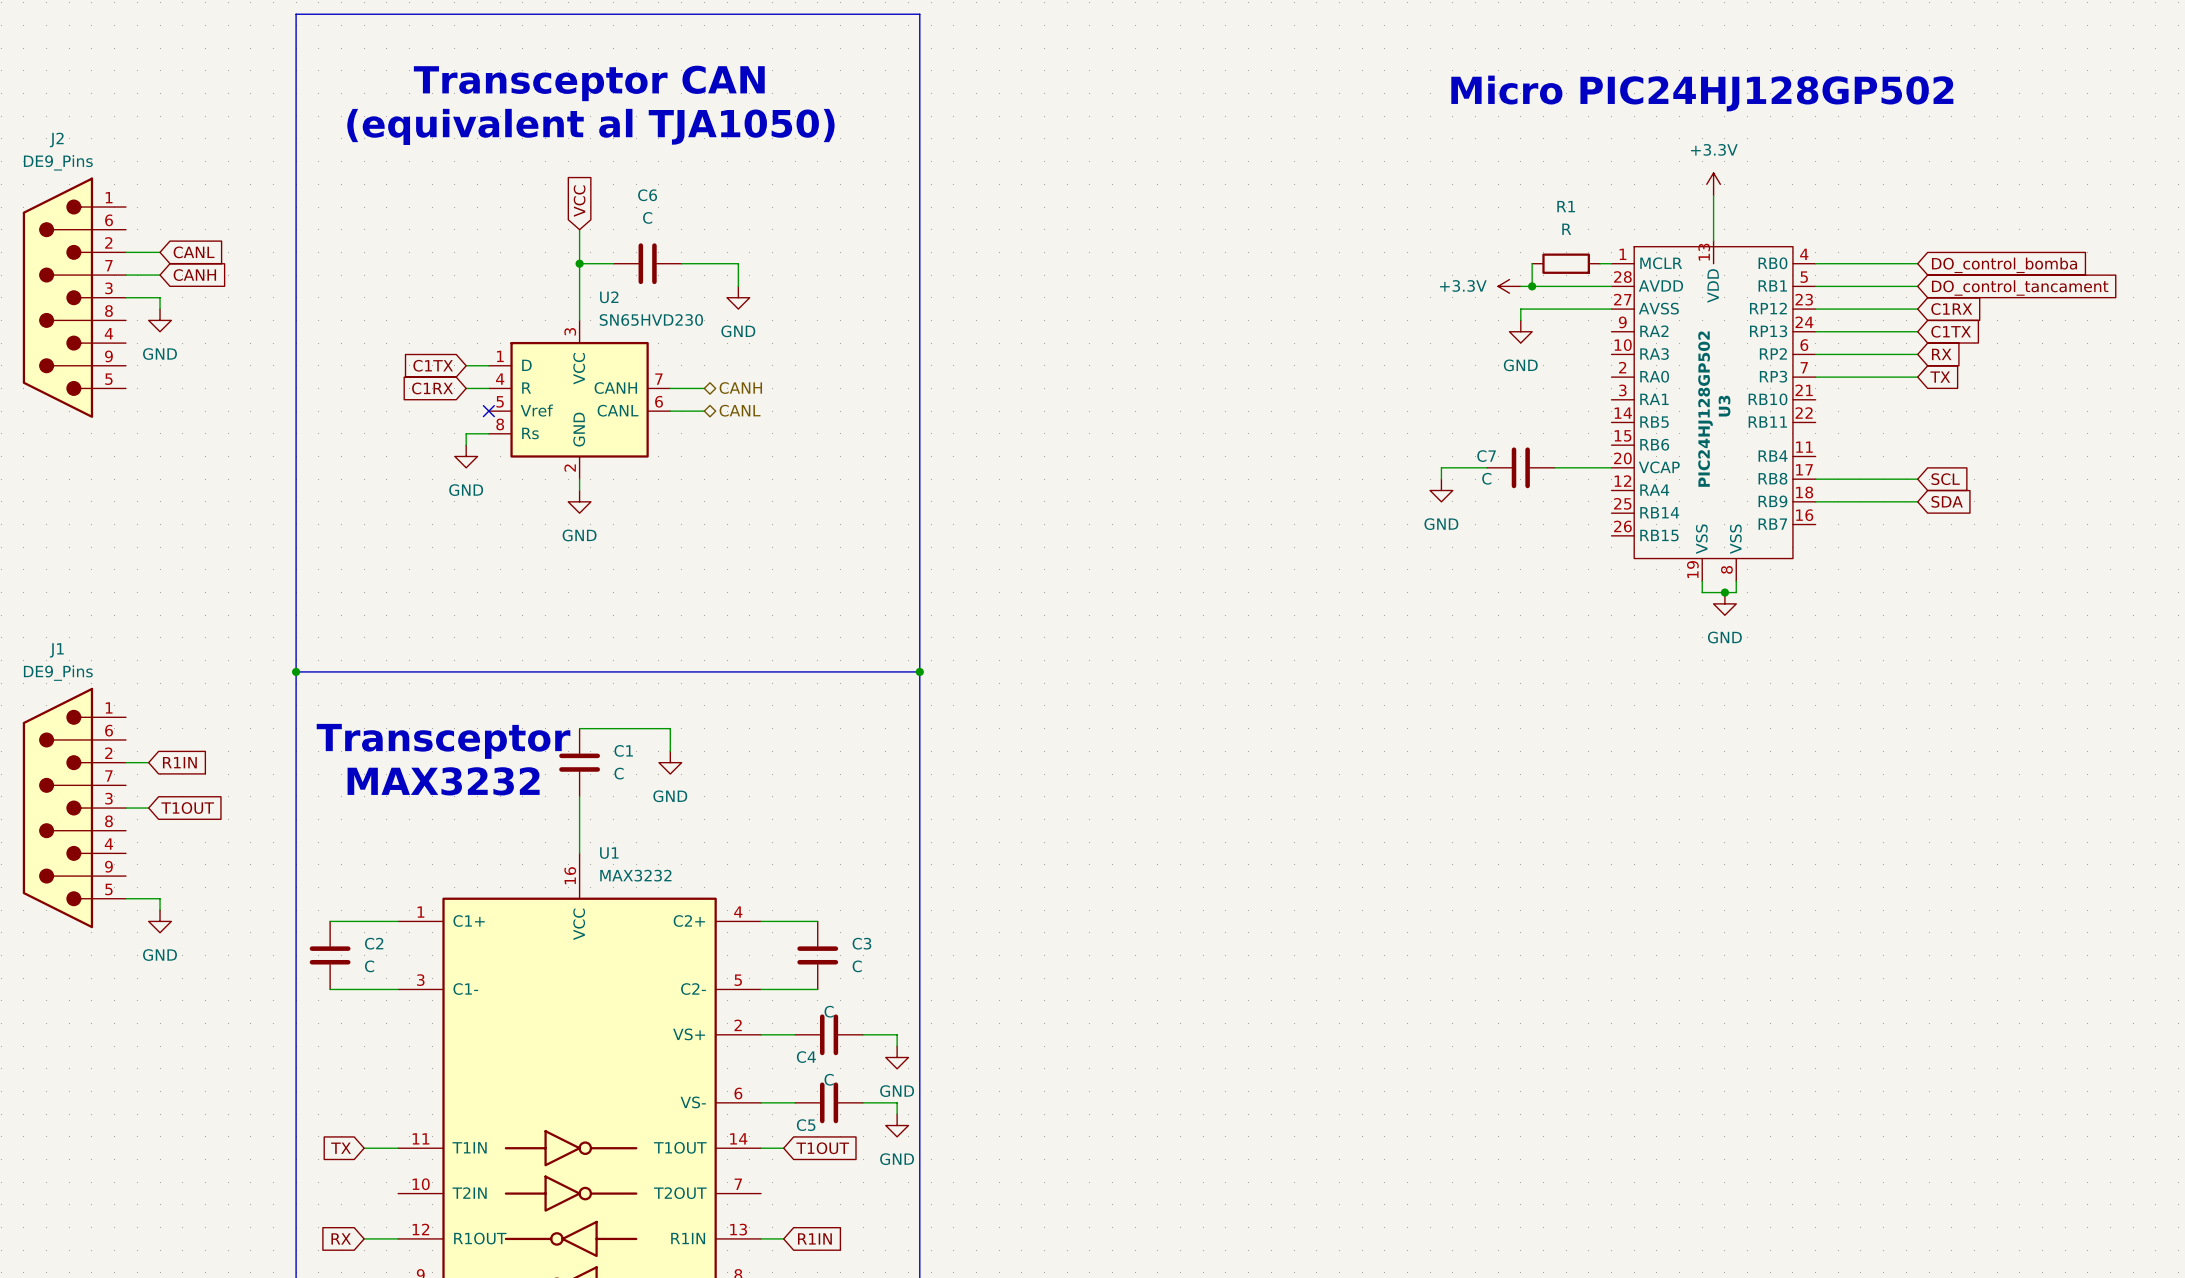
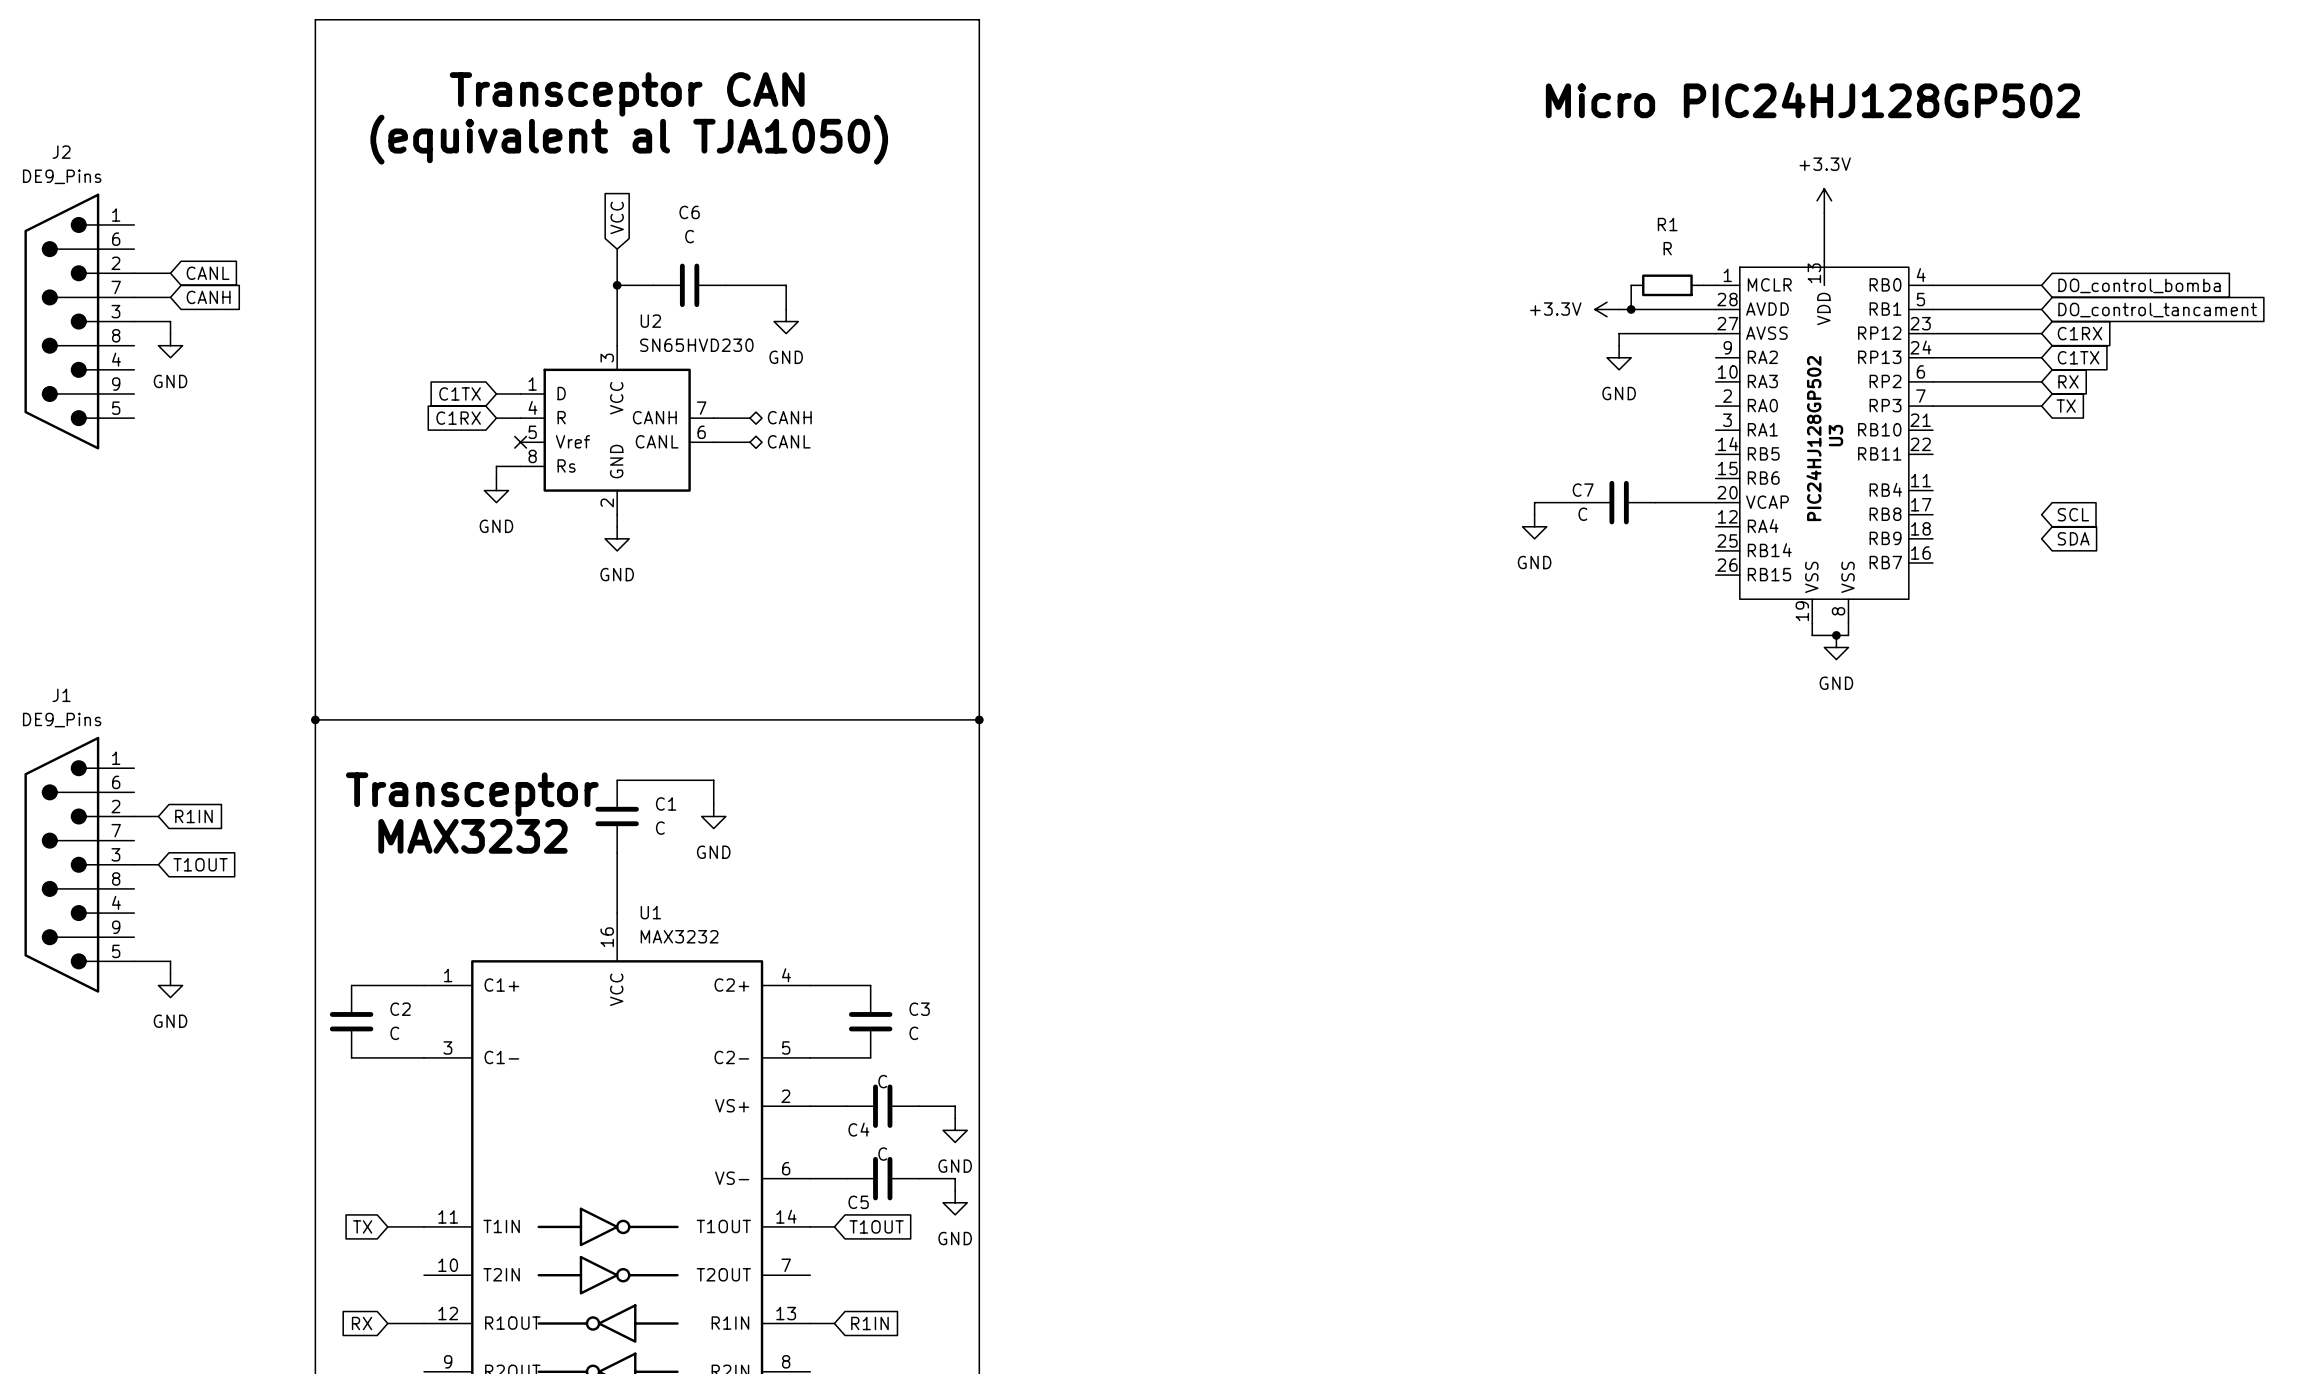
wire: (1815, 479) (1917, 479) -> none
wire: (1815, 501) (1917, 501) -> none

